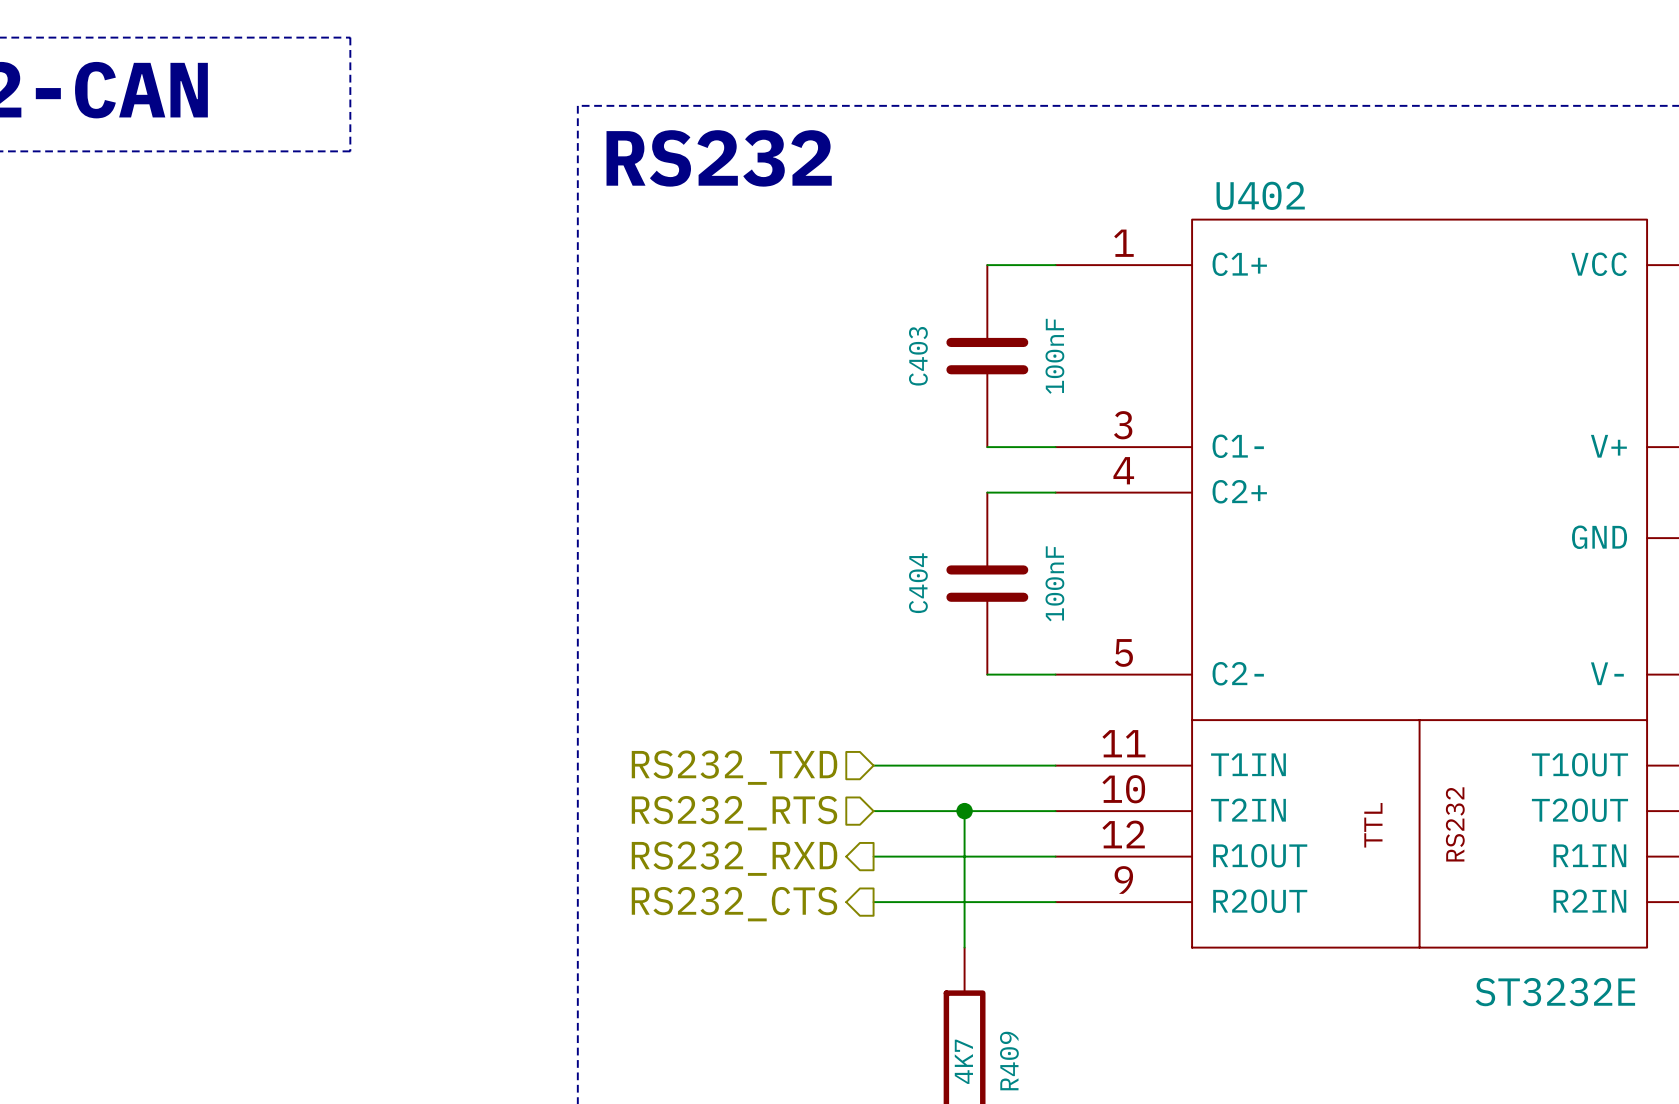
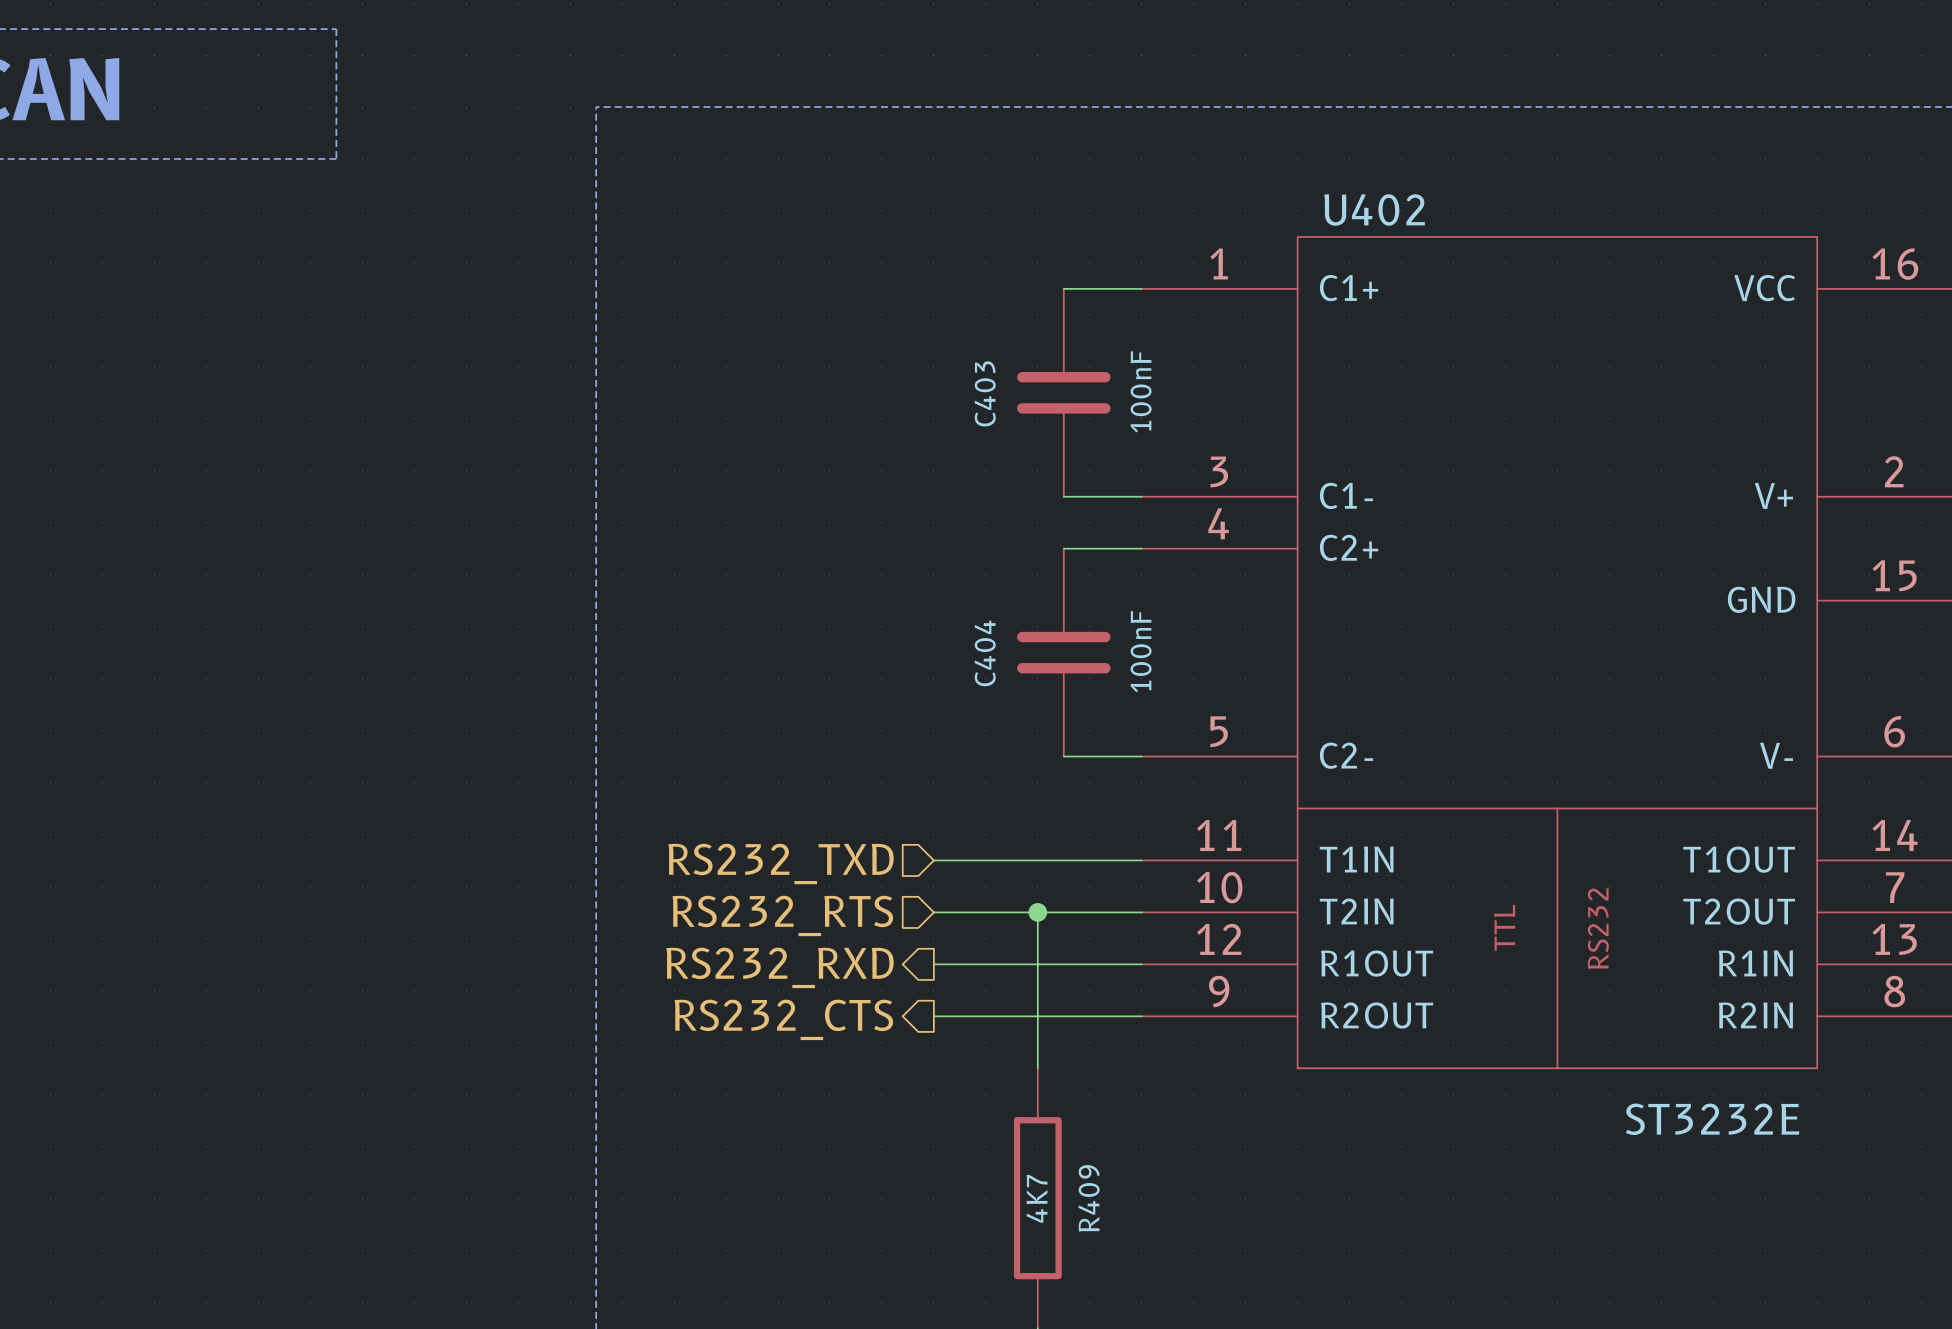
text: RS232 (719, 158) -> none

